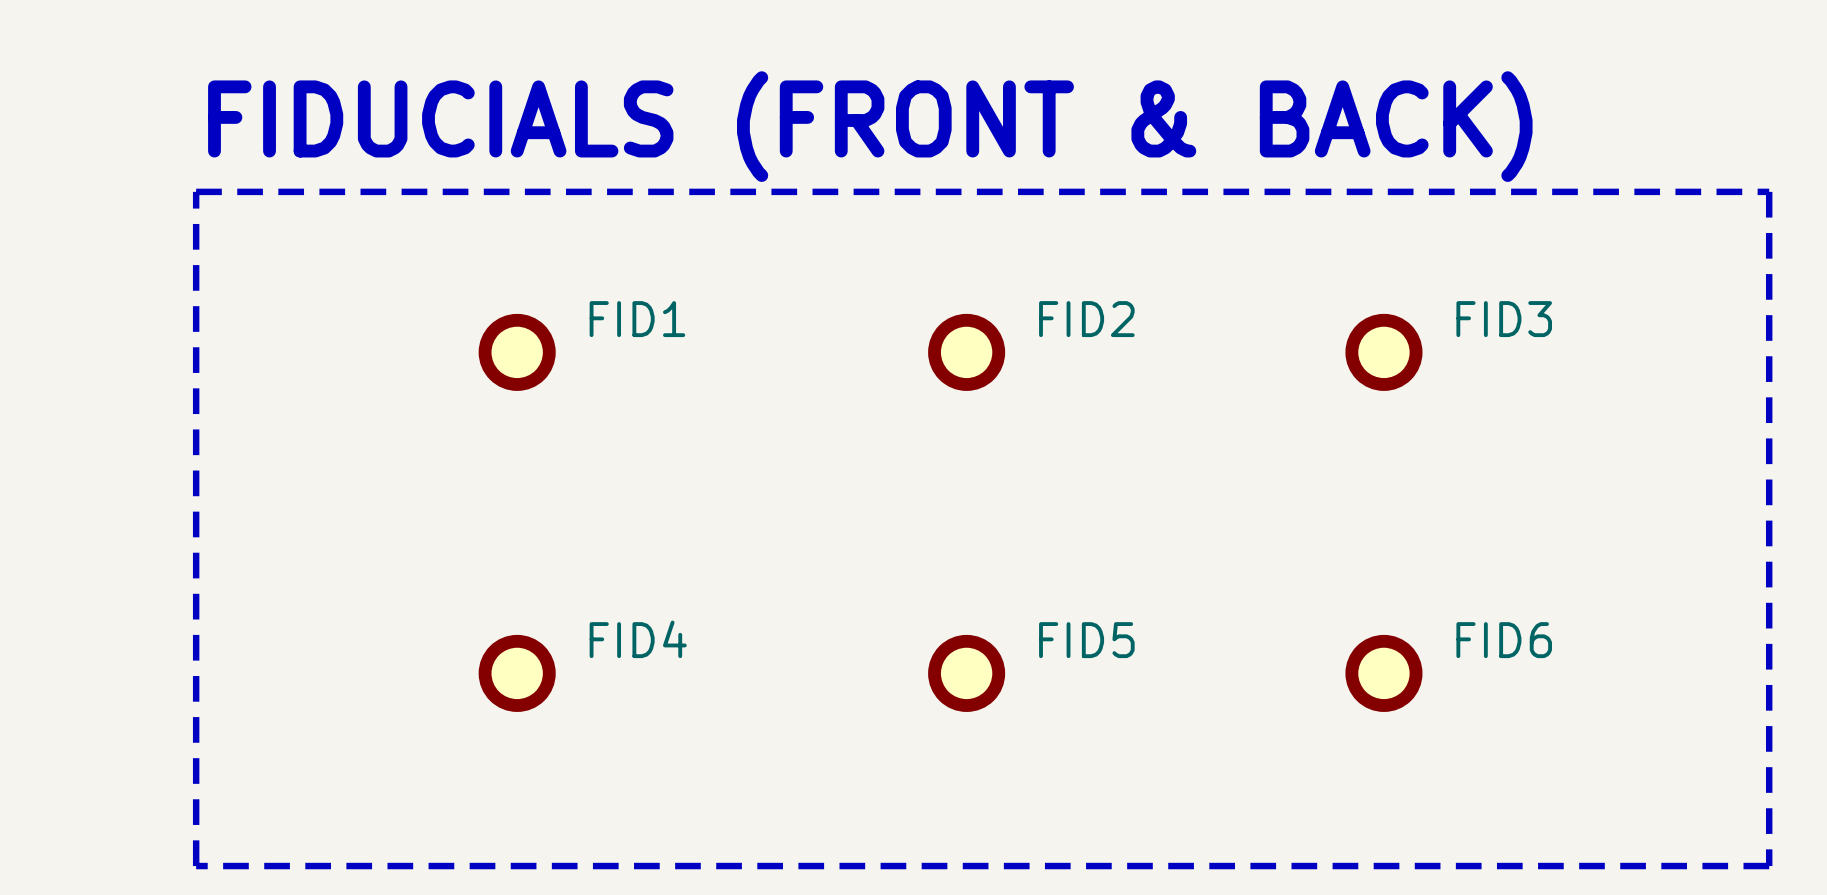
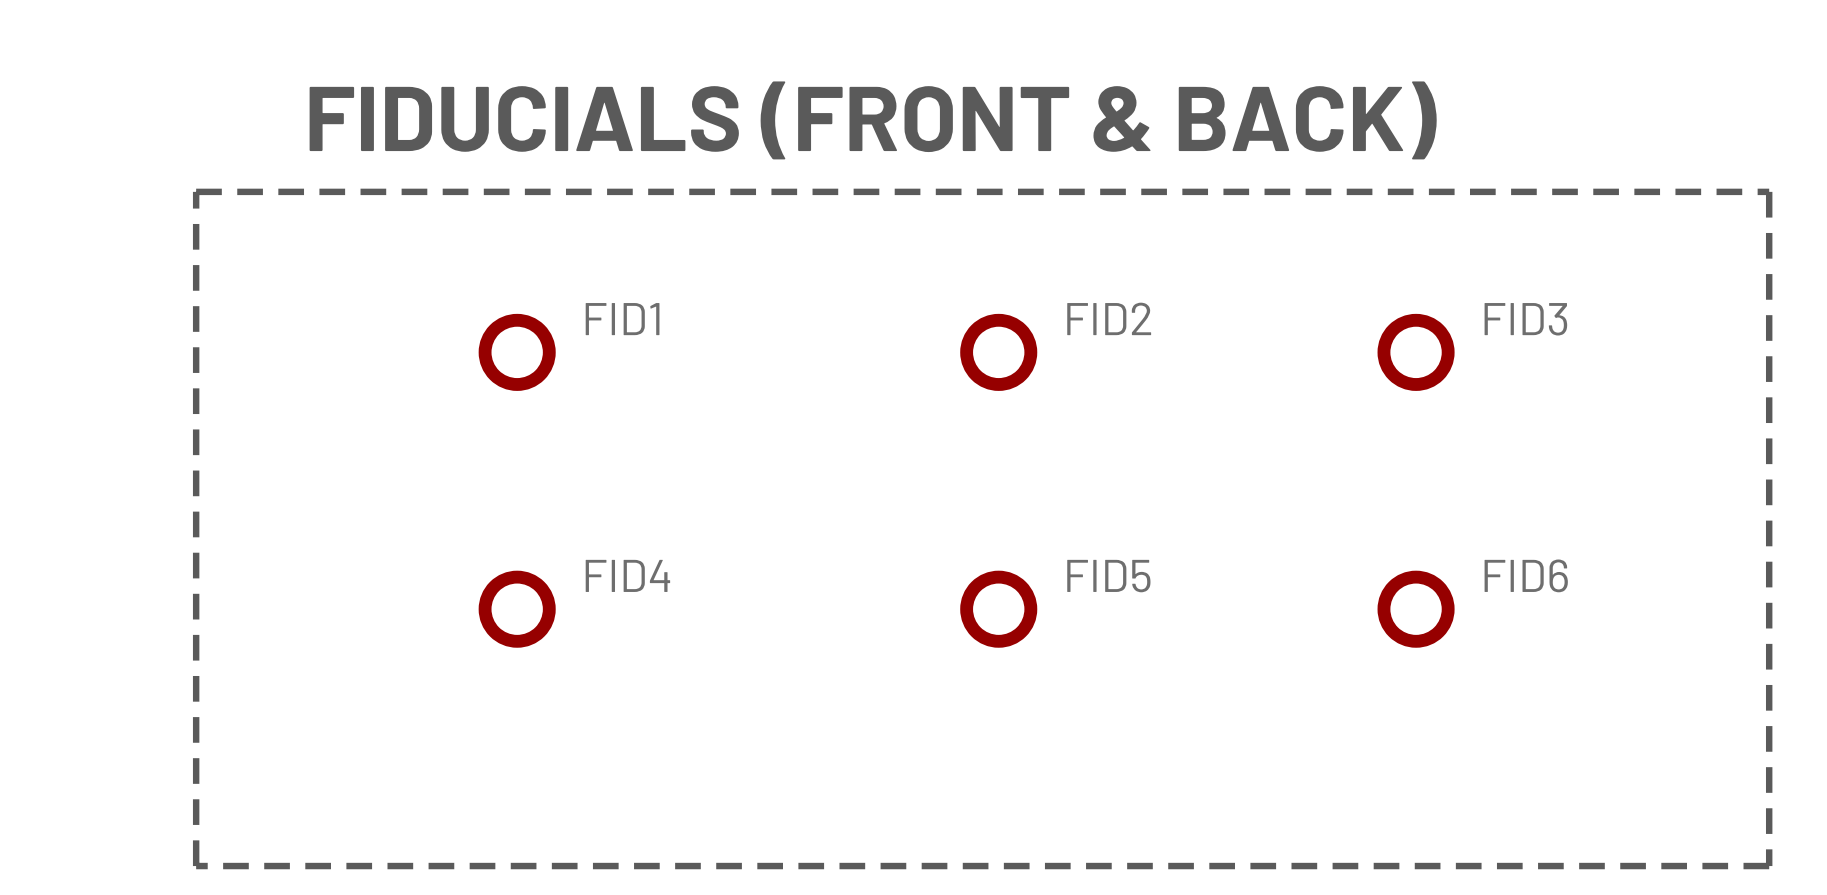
FID2 position: (966, 352) -> (998, 352)
FID3 position: (1383, 352) -> (1416, 352)
FID4 position: (517, 673) -> (517, 609)
FID5 position: (966, 673) -> (998, 609)
FID6 position: (1383, 673) -> (1416, 609)

